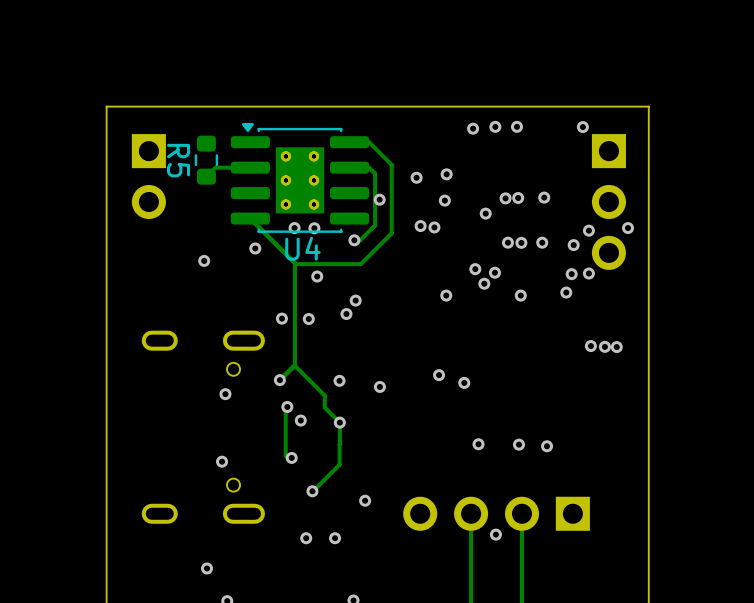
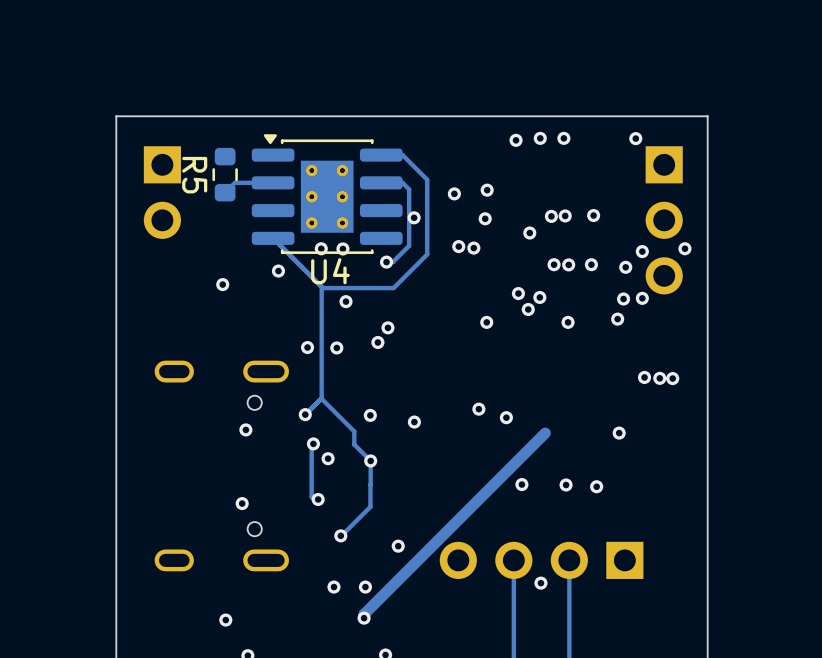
track: none -> (545, 433) (364, 614) (364, 618)
via: none -> (619, 433)
via: none -> (364, 618)

